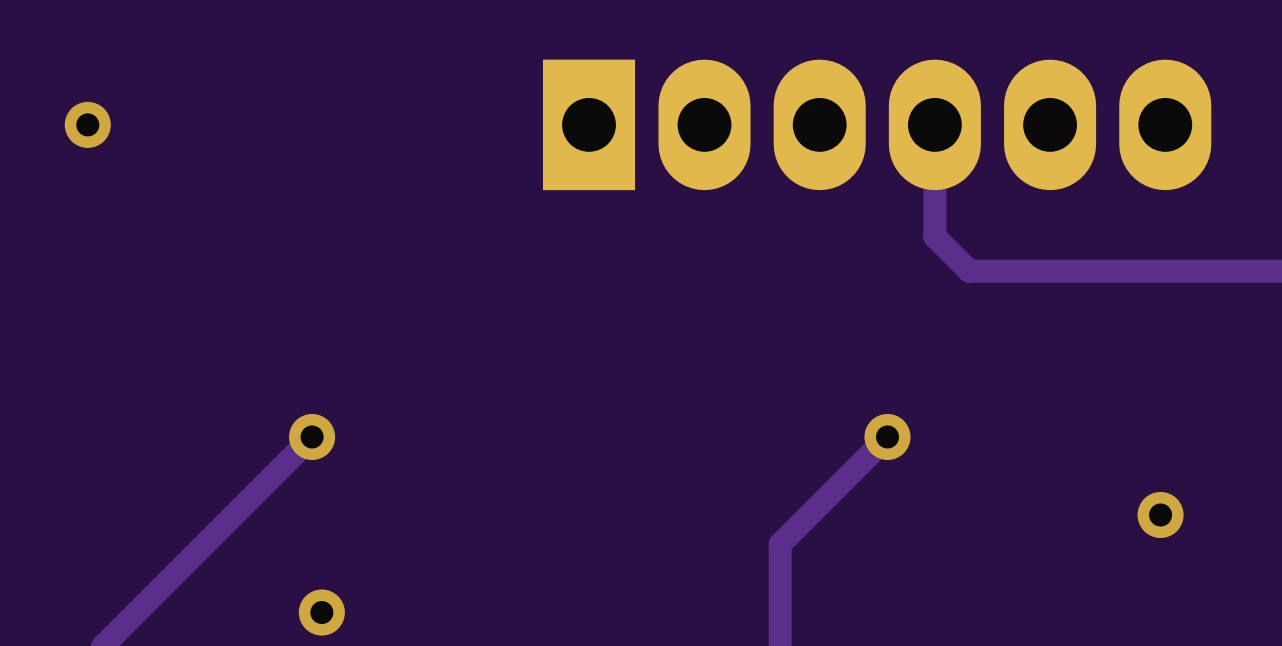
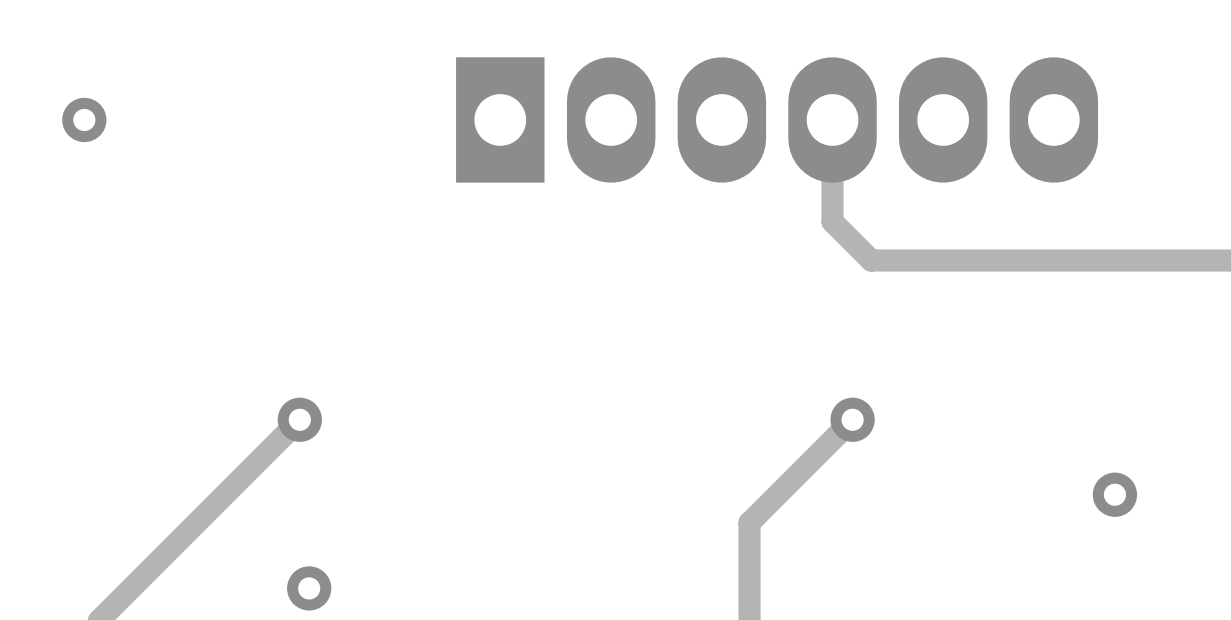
part position: (877, 124) -> (777, 119)
track: (934, 124) (934, 236) (969, 271) -> (832, 119) (832, 221) (871, 260) (931, 260)

